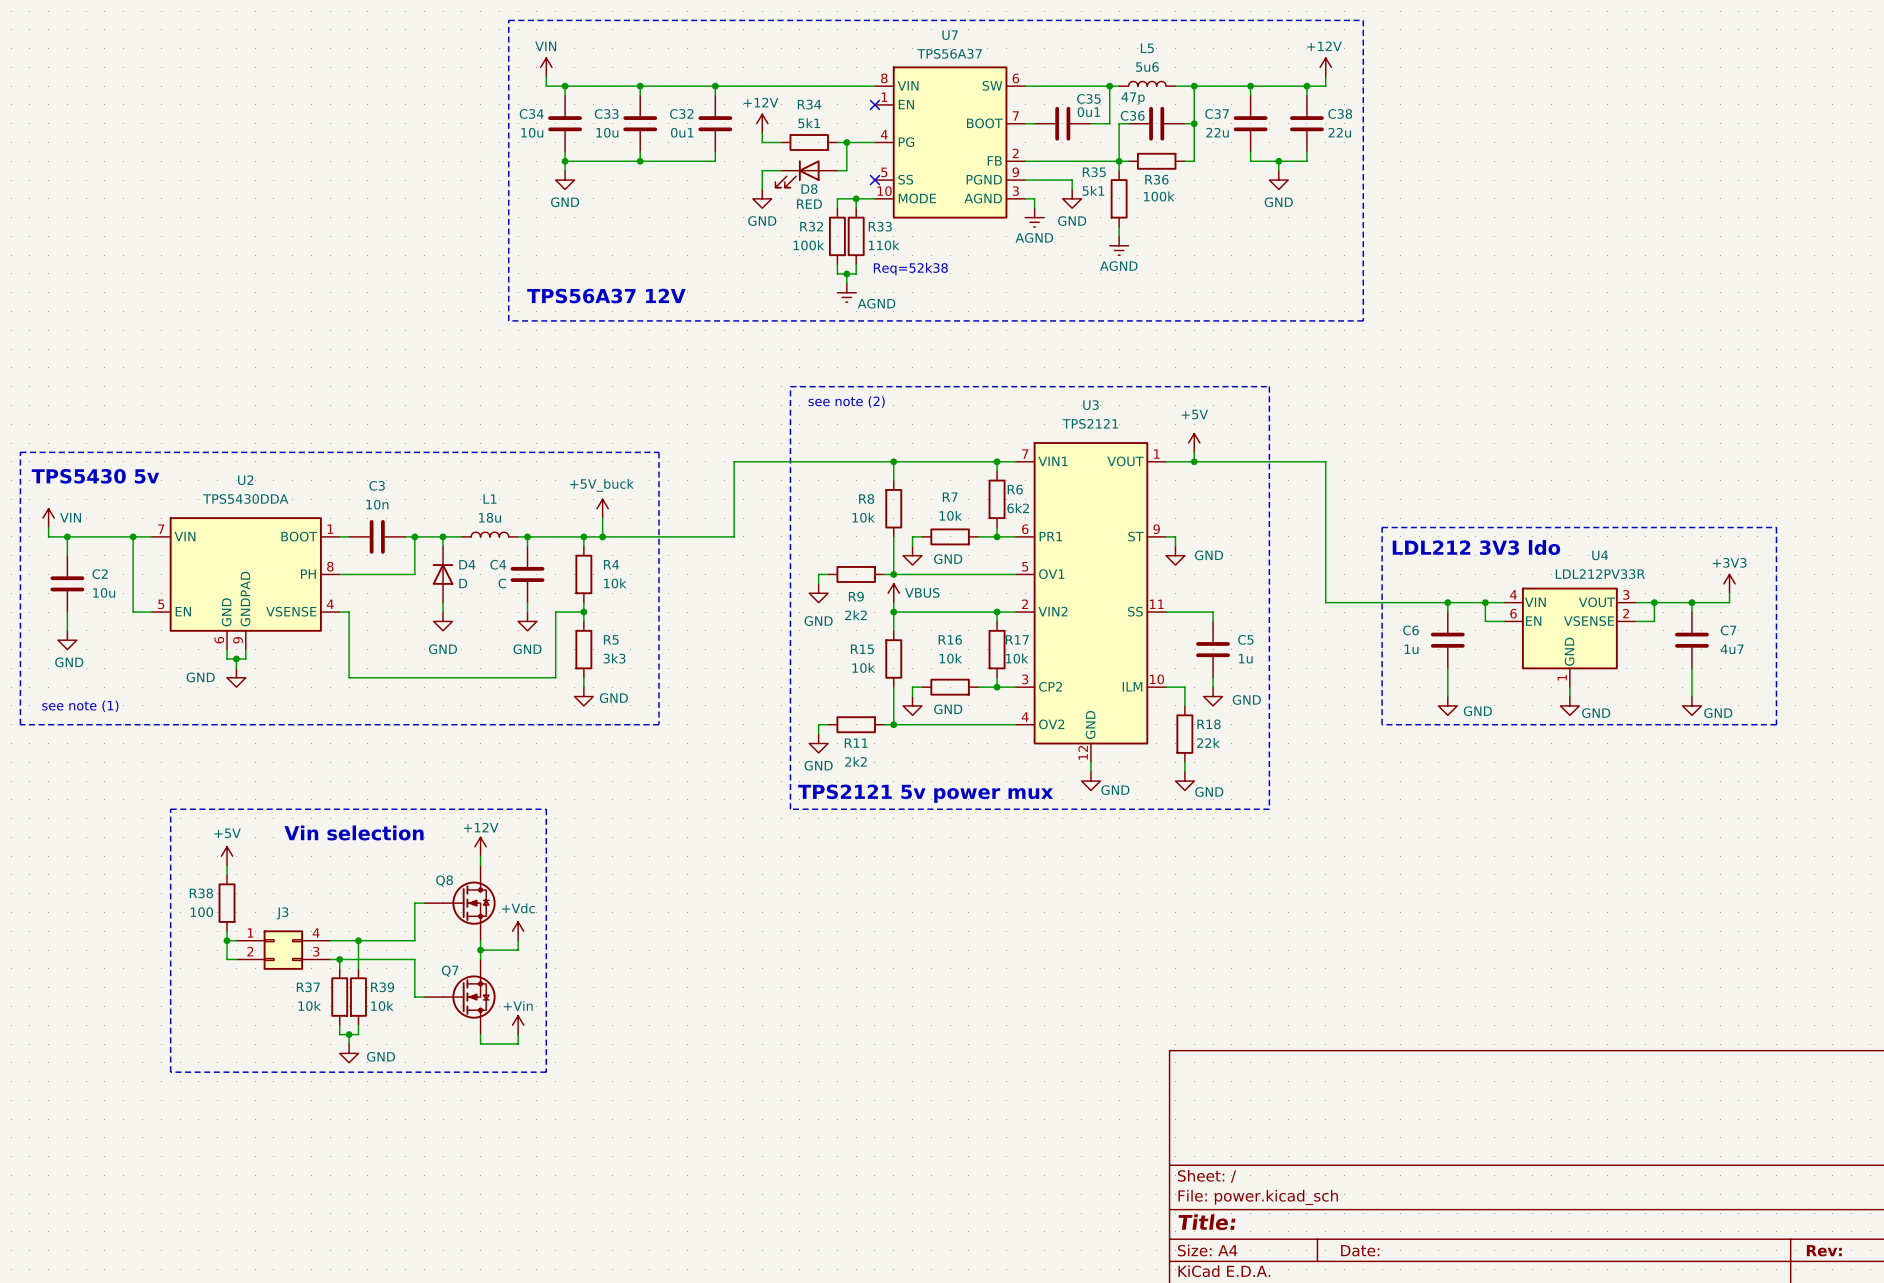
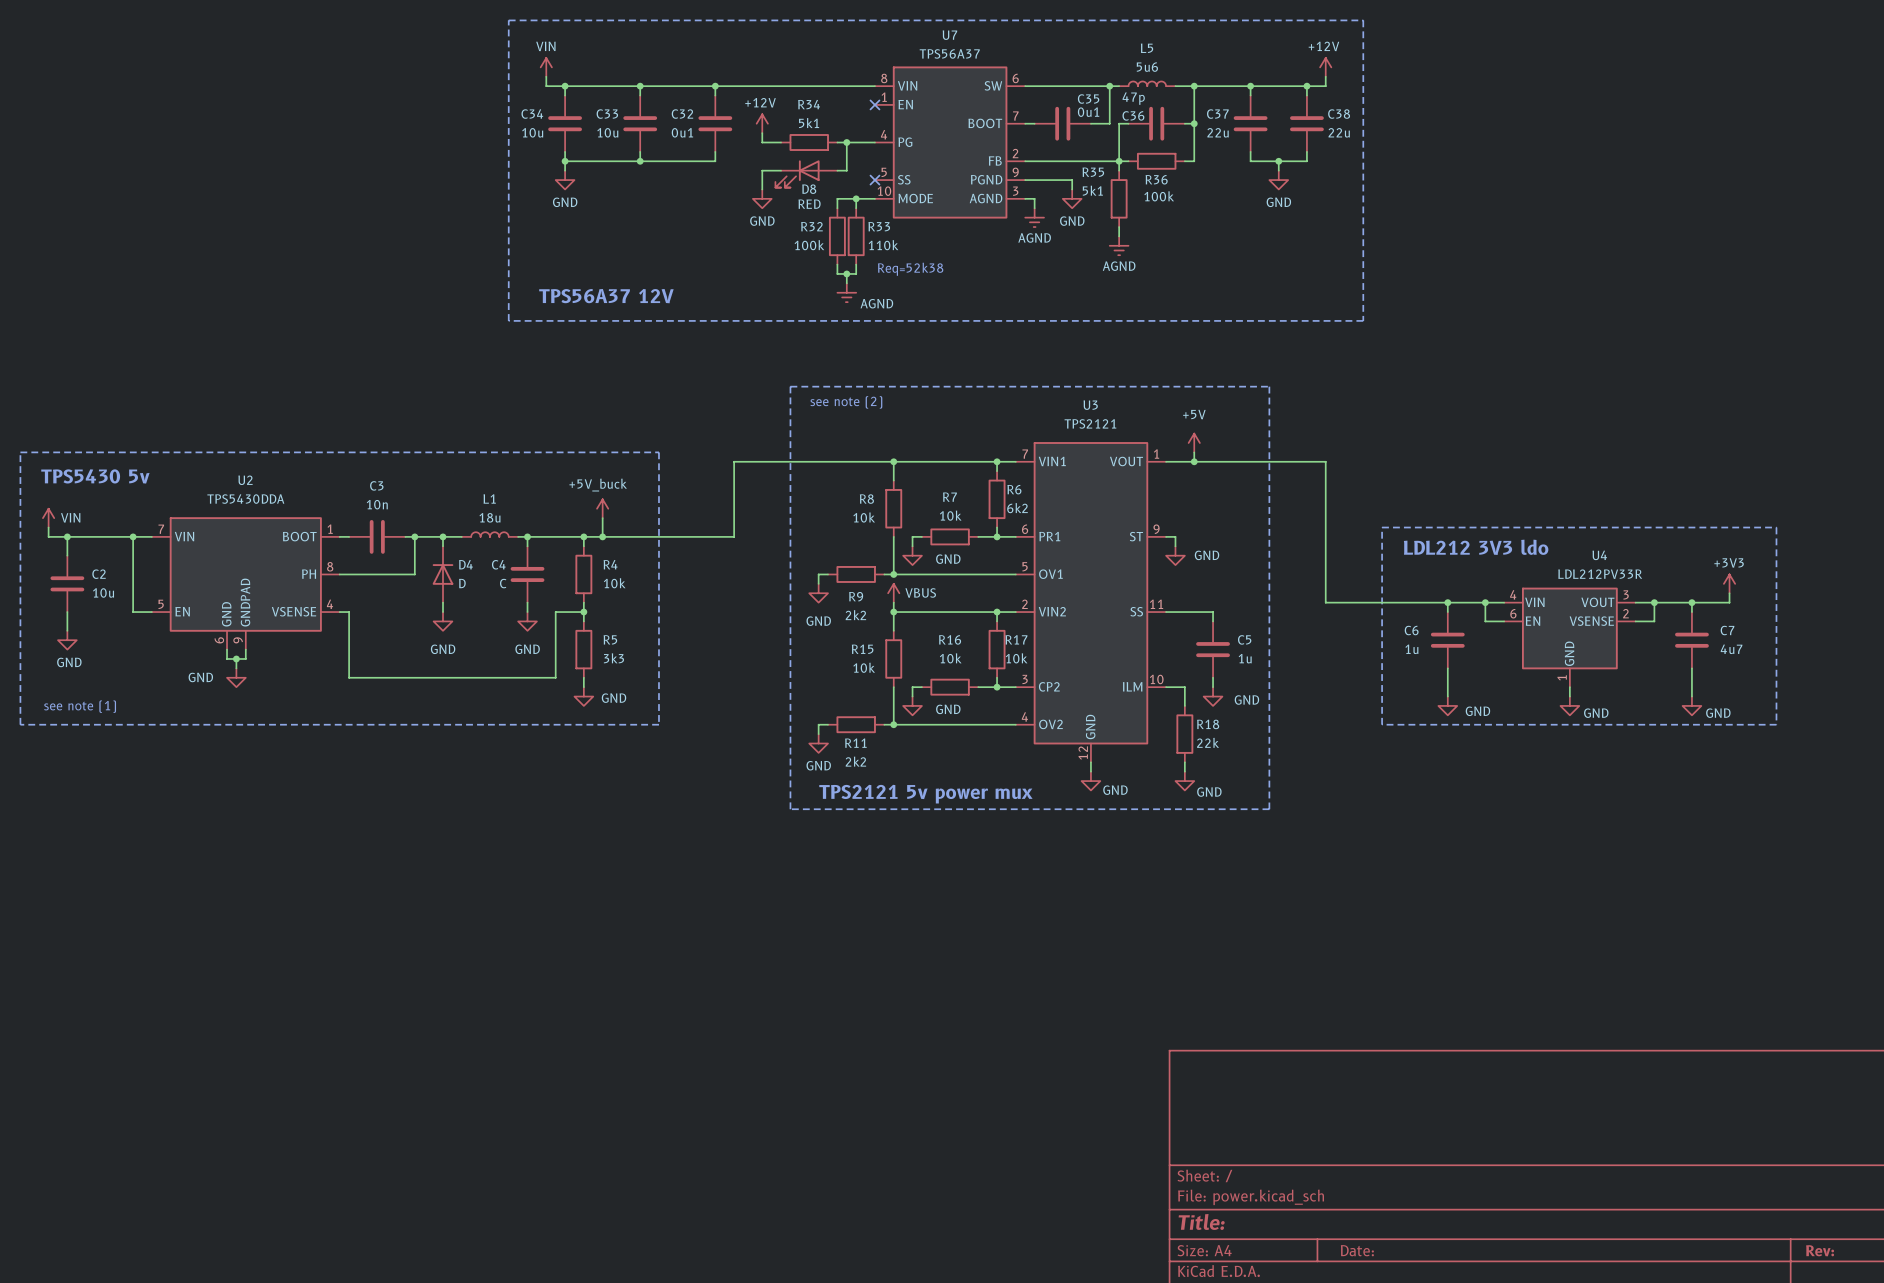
line: (170, 809) (546, 809) (546, 1072) (170, 1072) (170, 809) -> none
text: Vin selection (354, 832) -> none
power symbol: +12V (480, 846) -> none
power symbol: +5V (227, 856) -> none
wire: (480, 856) (480, 865) -> none
wire: (227, 865) (227, 874) -> none
R38: 100 (227, 903) -> none
wire: (424, 903) (414, 903) (414, 940) (330, 940) -> none
Q8: (459, 903) -> none
wire: (227, 931) (227, 959) (236, 959) -> none
power symbol: +Vdc (518, 931) -> none
wire: (227, 940) (236, 940) -> none
junction: (227, 940) -> none
wire: (358, 940) (358, 968) -> none
junction: (358, 940) -> none
wire: (480, 940) (480, 959) -> none
wire: (518, 940) (518, 950) (480, 950) -> none
J3: (283, 950) -> none
junction: (480, 950) -> none
wire: (330, 959) (414, 959) (414, 997) (424, 997) -> none
wire: (339, 959) (339, 968) -> none
junction: (339, 959) -> none
R37: 10k (339, 997) -> none
R39: 10k (358, 997) -> none
Q7: (459, 997) -> none
wire: (339, 1025) (339, 1034) (358, 1034) (358, 1025) -> none
power symbol: +Vin (518, 1025) -> none
wire: (349, 1034) (349, 1044) -> none
junction: (349, 1034) -> none
wire: (480, 1034) (480, 1044) (518, 1044) (518, 1034) -> none
power symbol: GND (349, 1053) -> none

